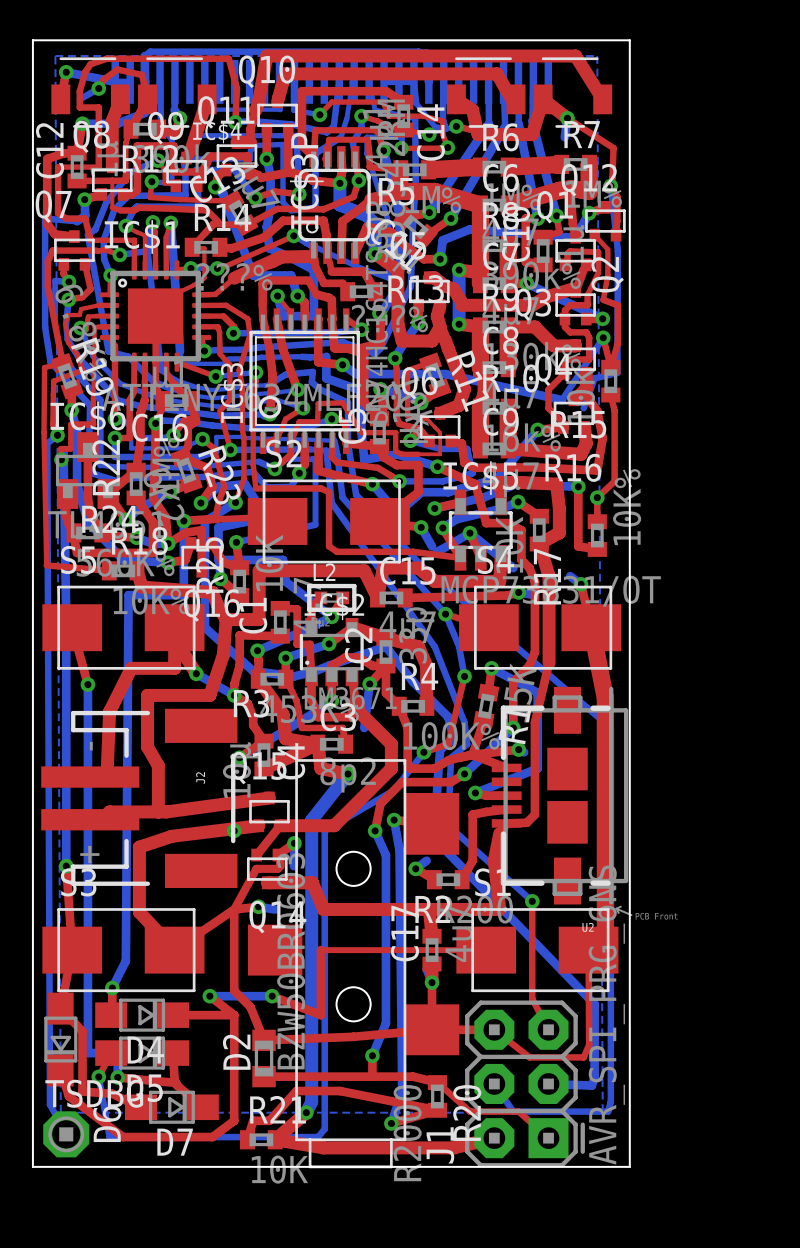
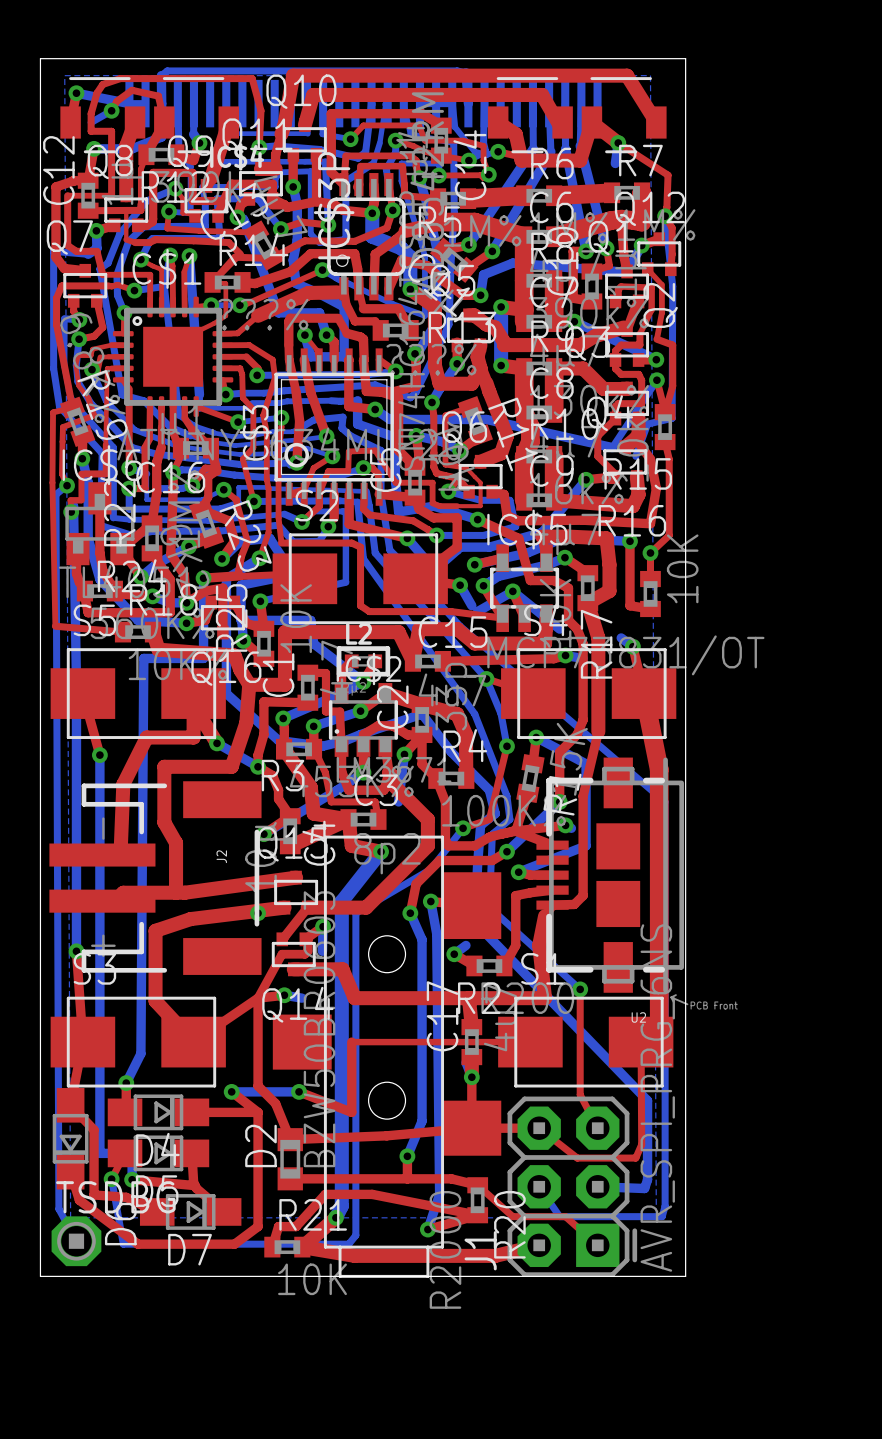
R16 value: 10K% (627, 507) -> 10K (682, 568)

